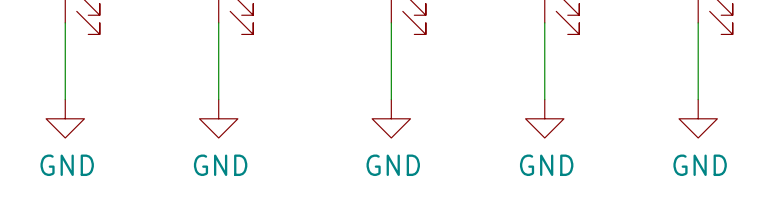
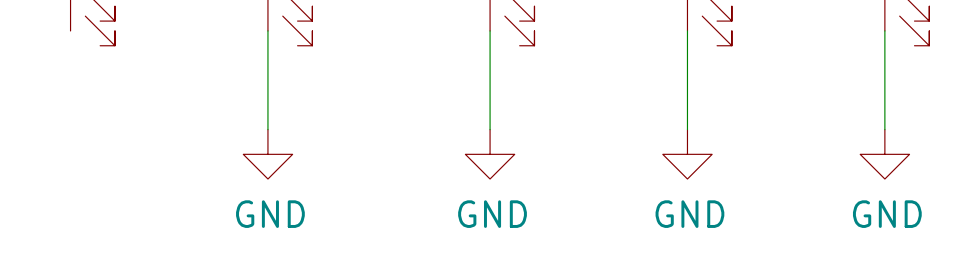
wire: (65, 22) (65, 99) -> none
power symbol: GND (65, 118) -> none

